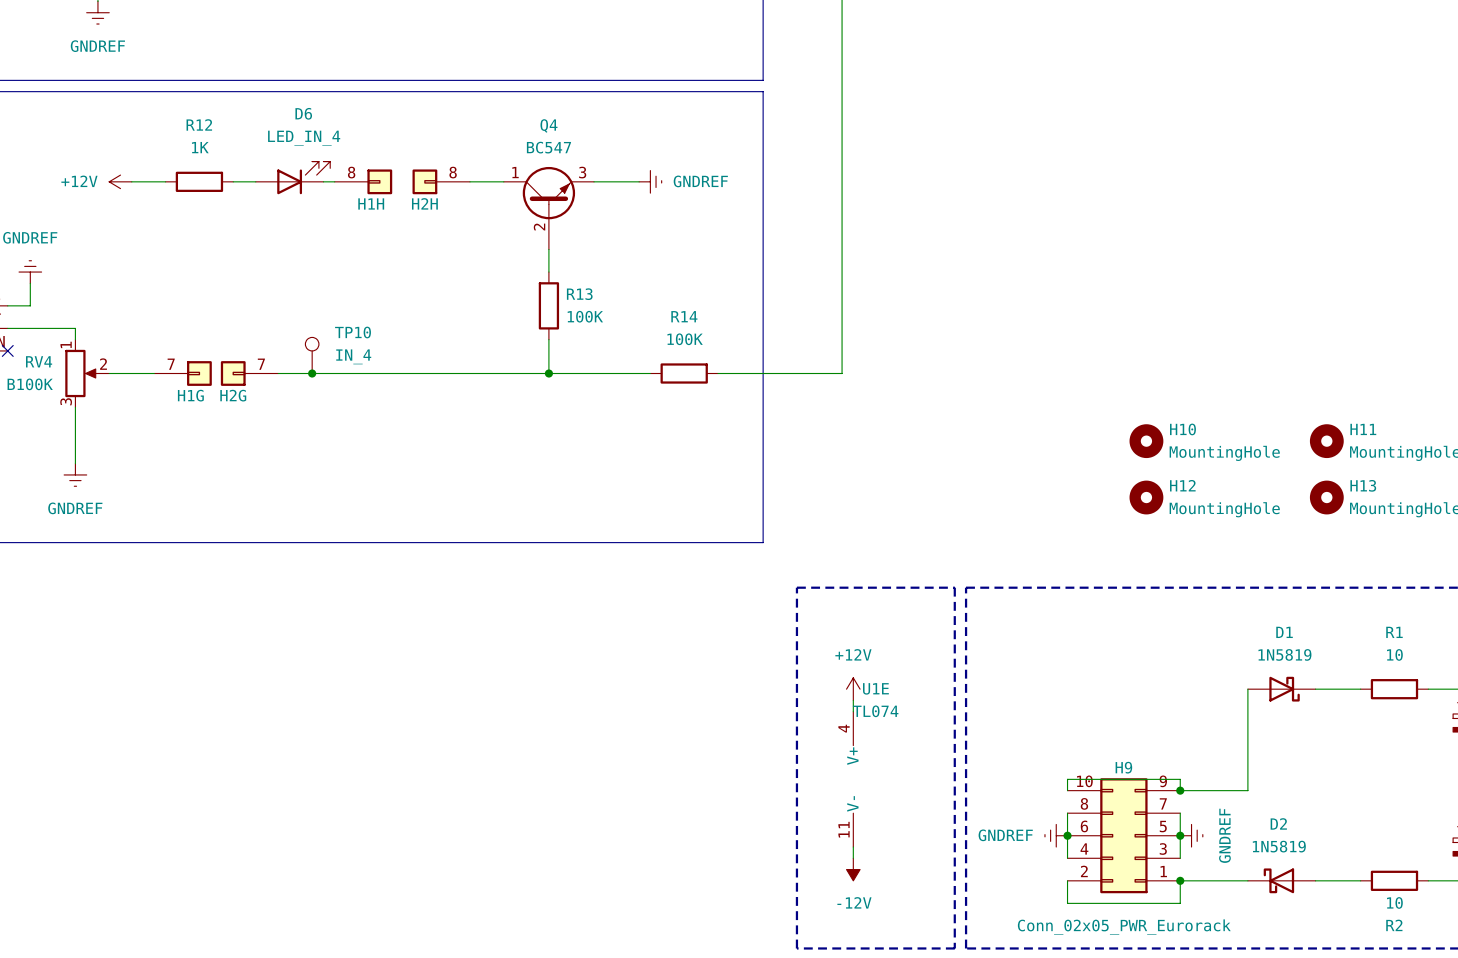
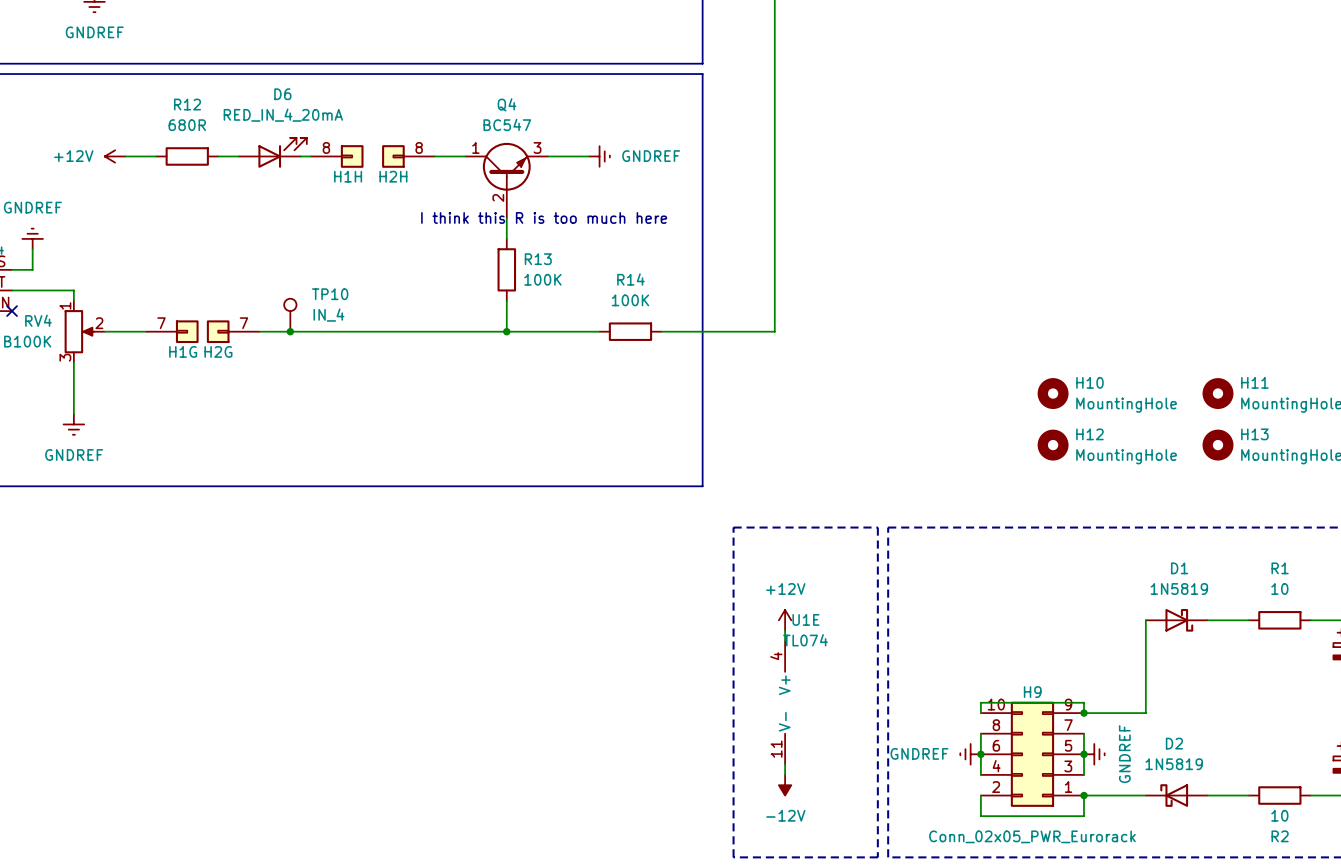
D6 value: LED_IN_4 (304, 138) -> RED_IN_4_20mA (283, 115)
R12 value: 1K (200, 147) -> 680R (187, 125)
text: none -> I think this R is too much here (544, 217)

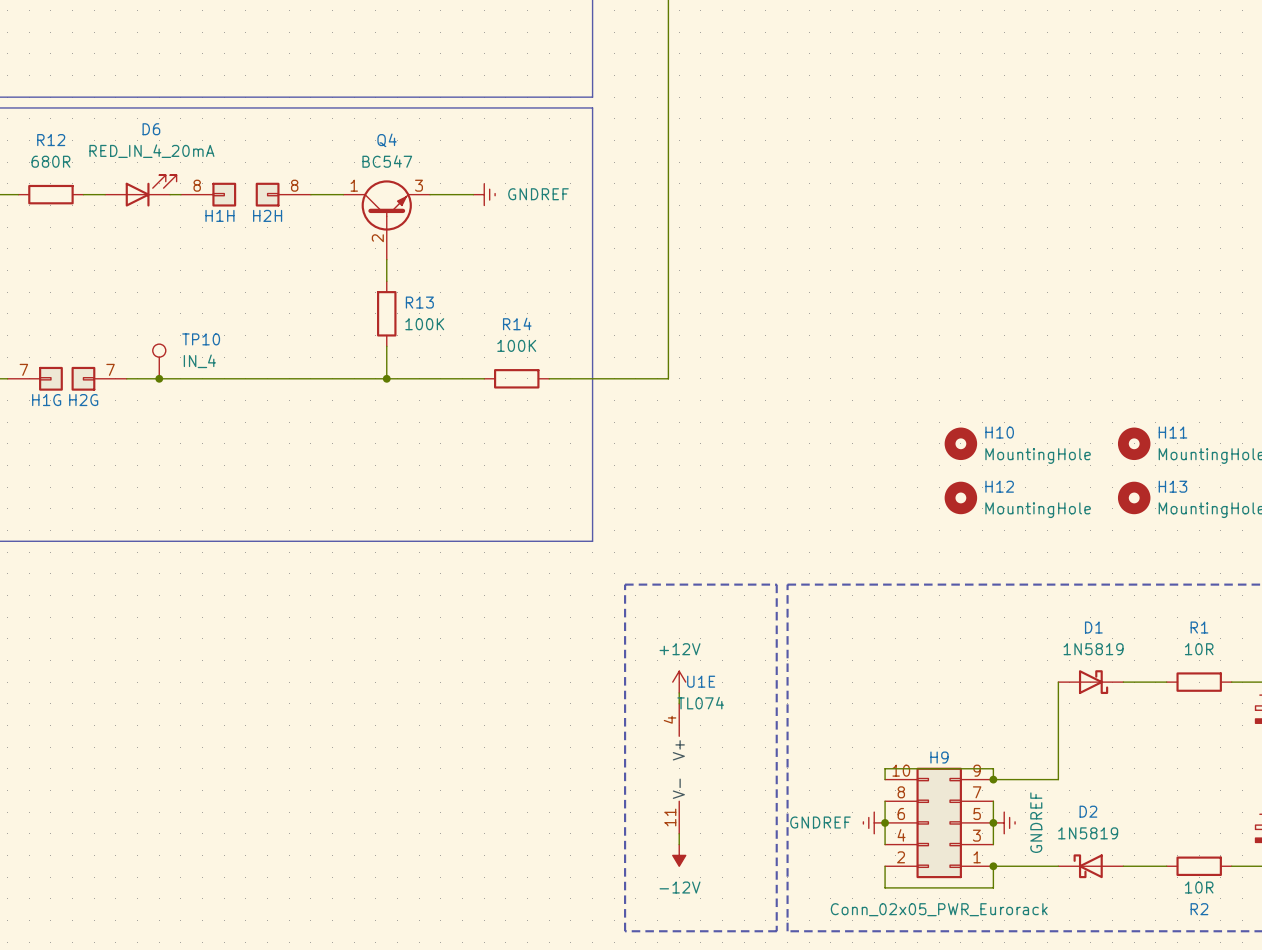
text: I think this R is too much here (544, 217) -> none
R1 value: 10 (1279, 589) -> 10R (1199, 649)
R2 value: 10 (1279, 815) -> 10R (1199, 887)

